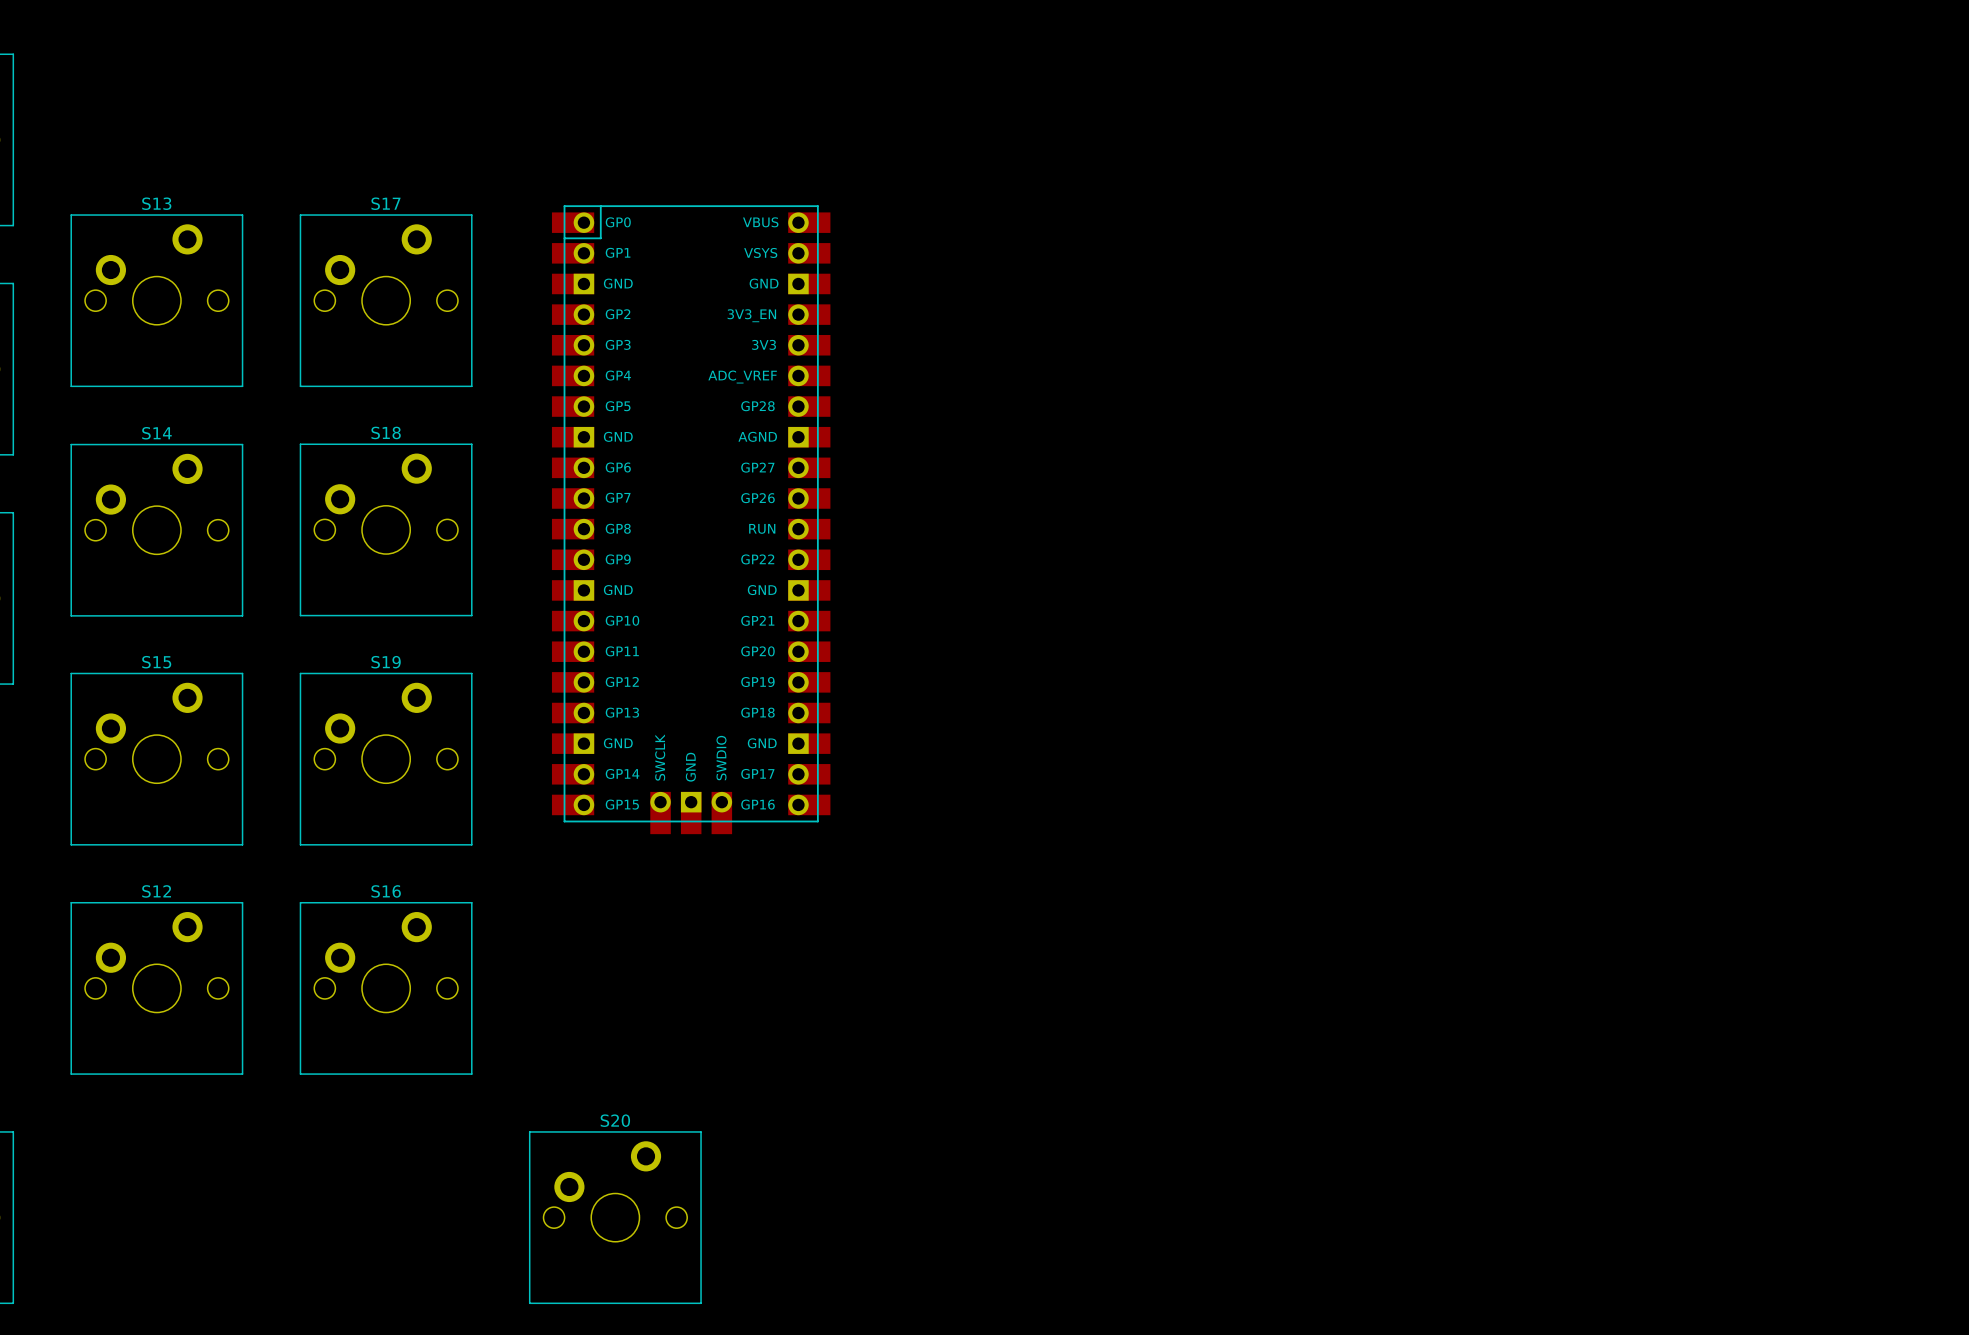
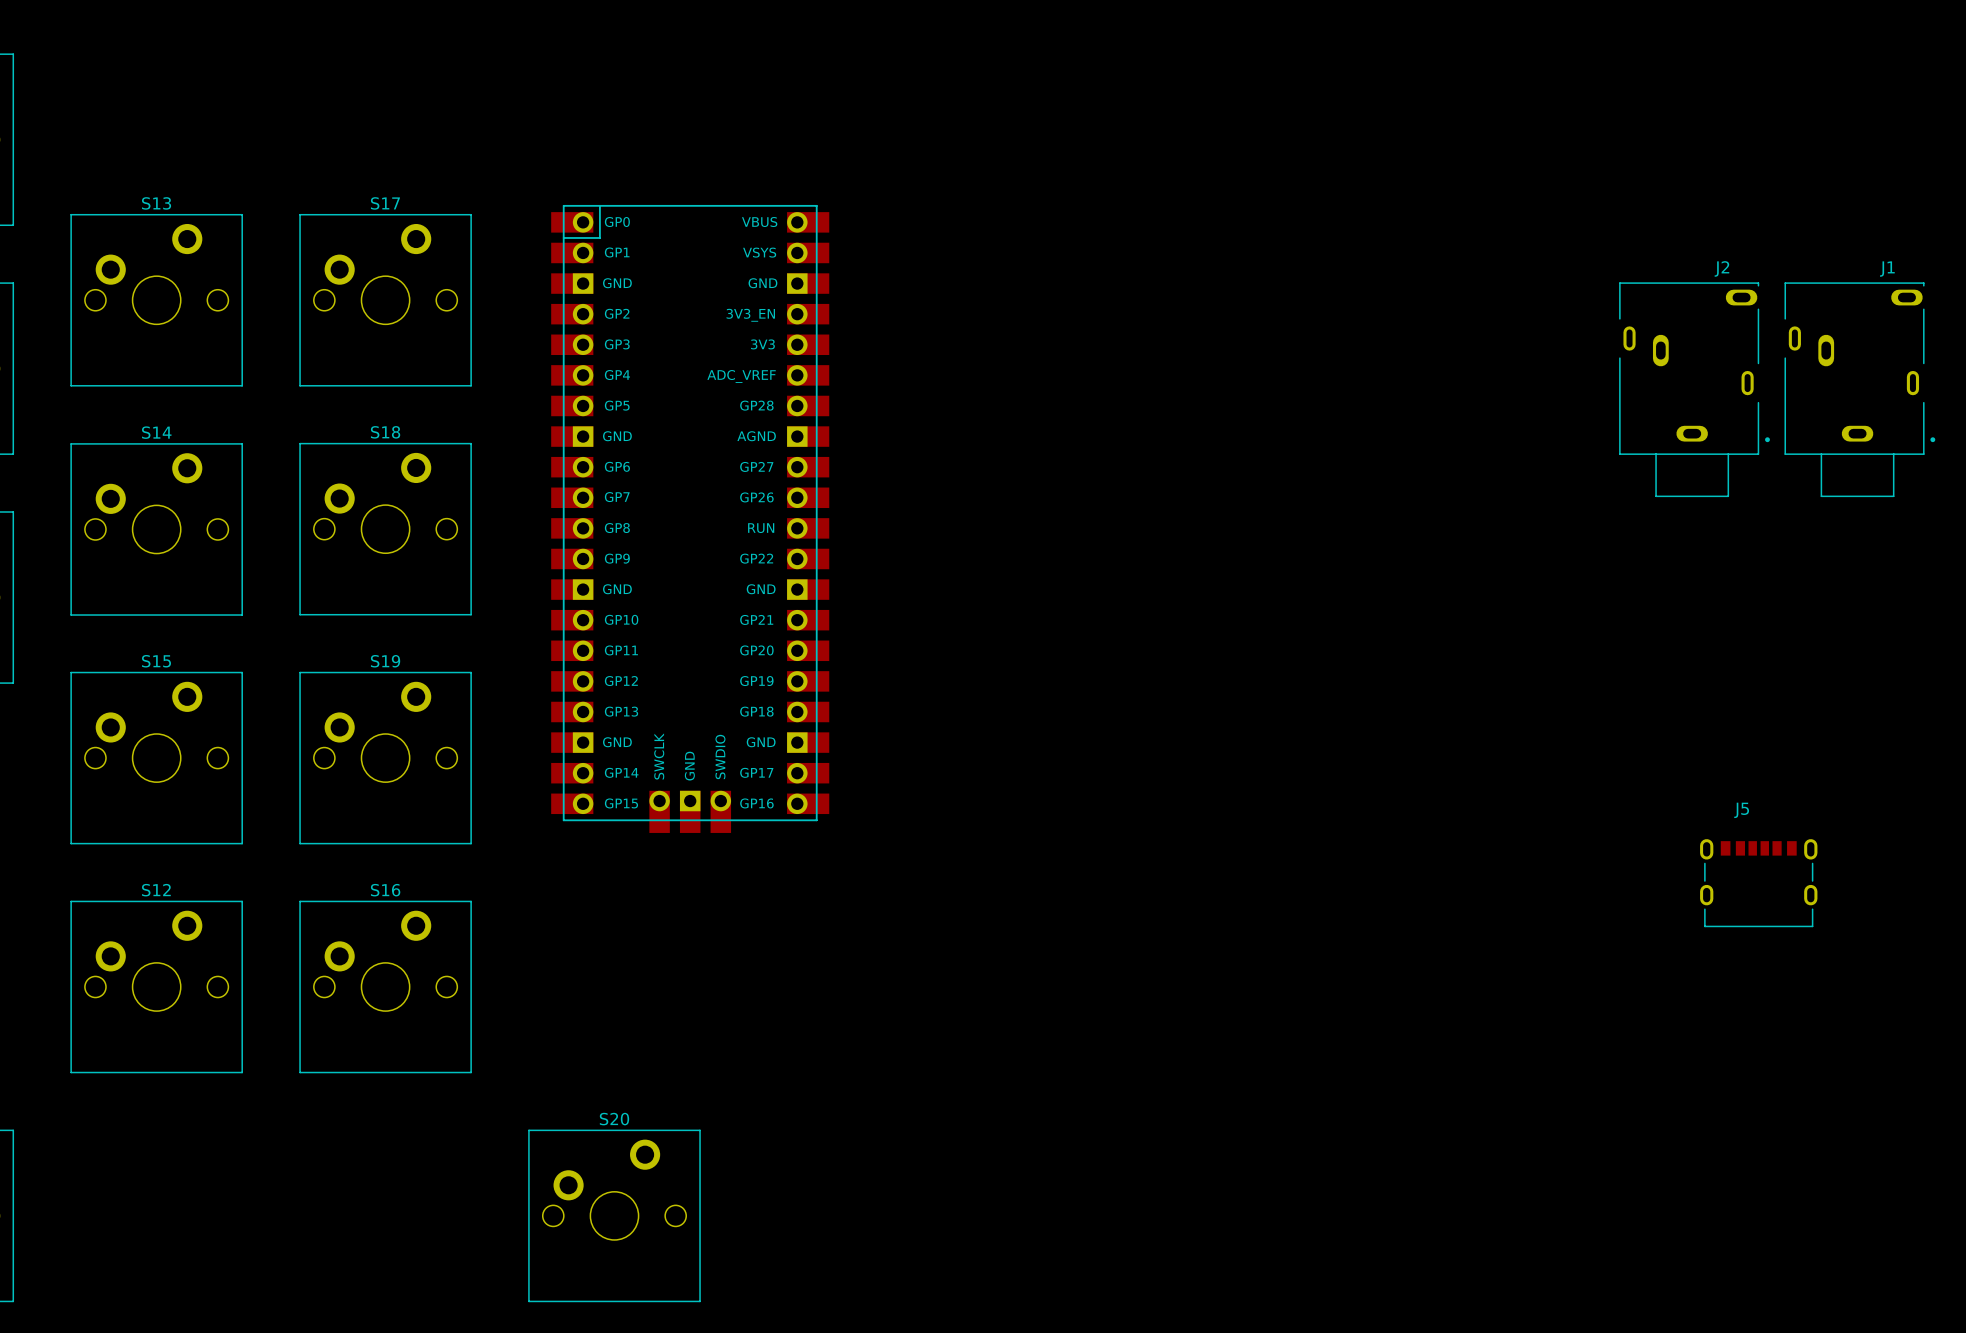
J2: none -> (1694, 389)
J1: none -> (1859, 389)
J5: none -> (1758, 883)

